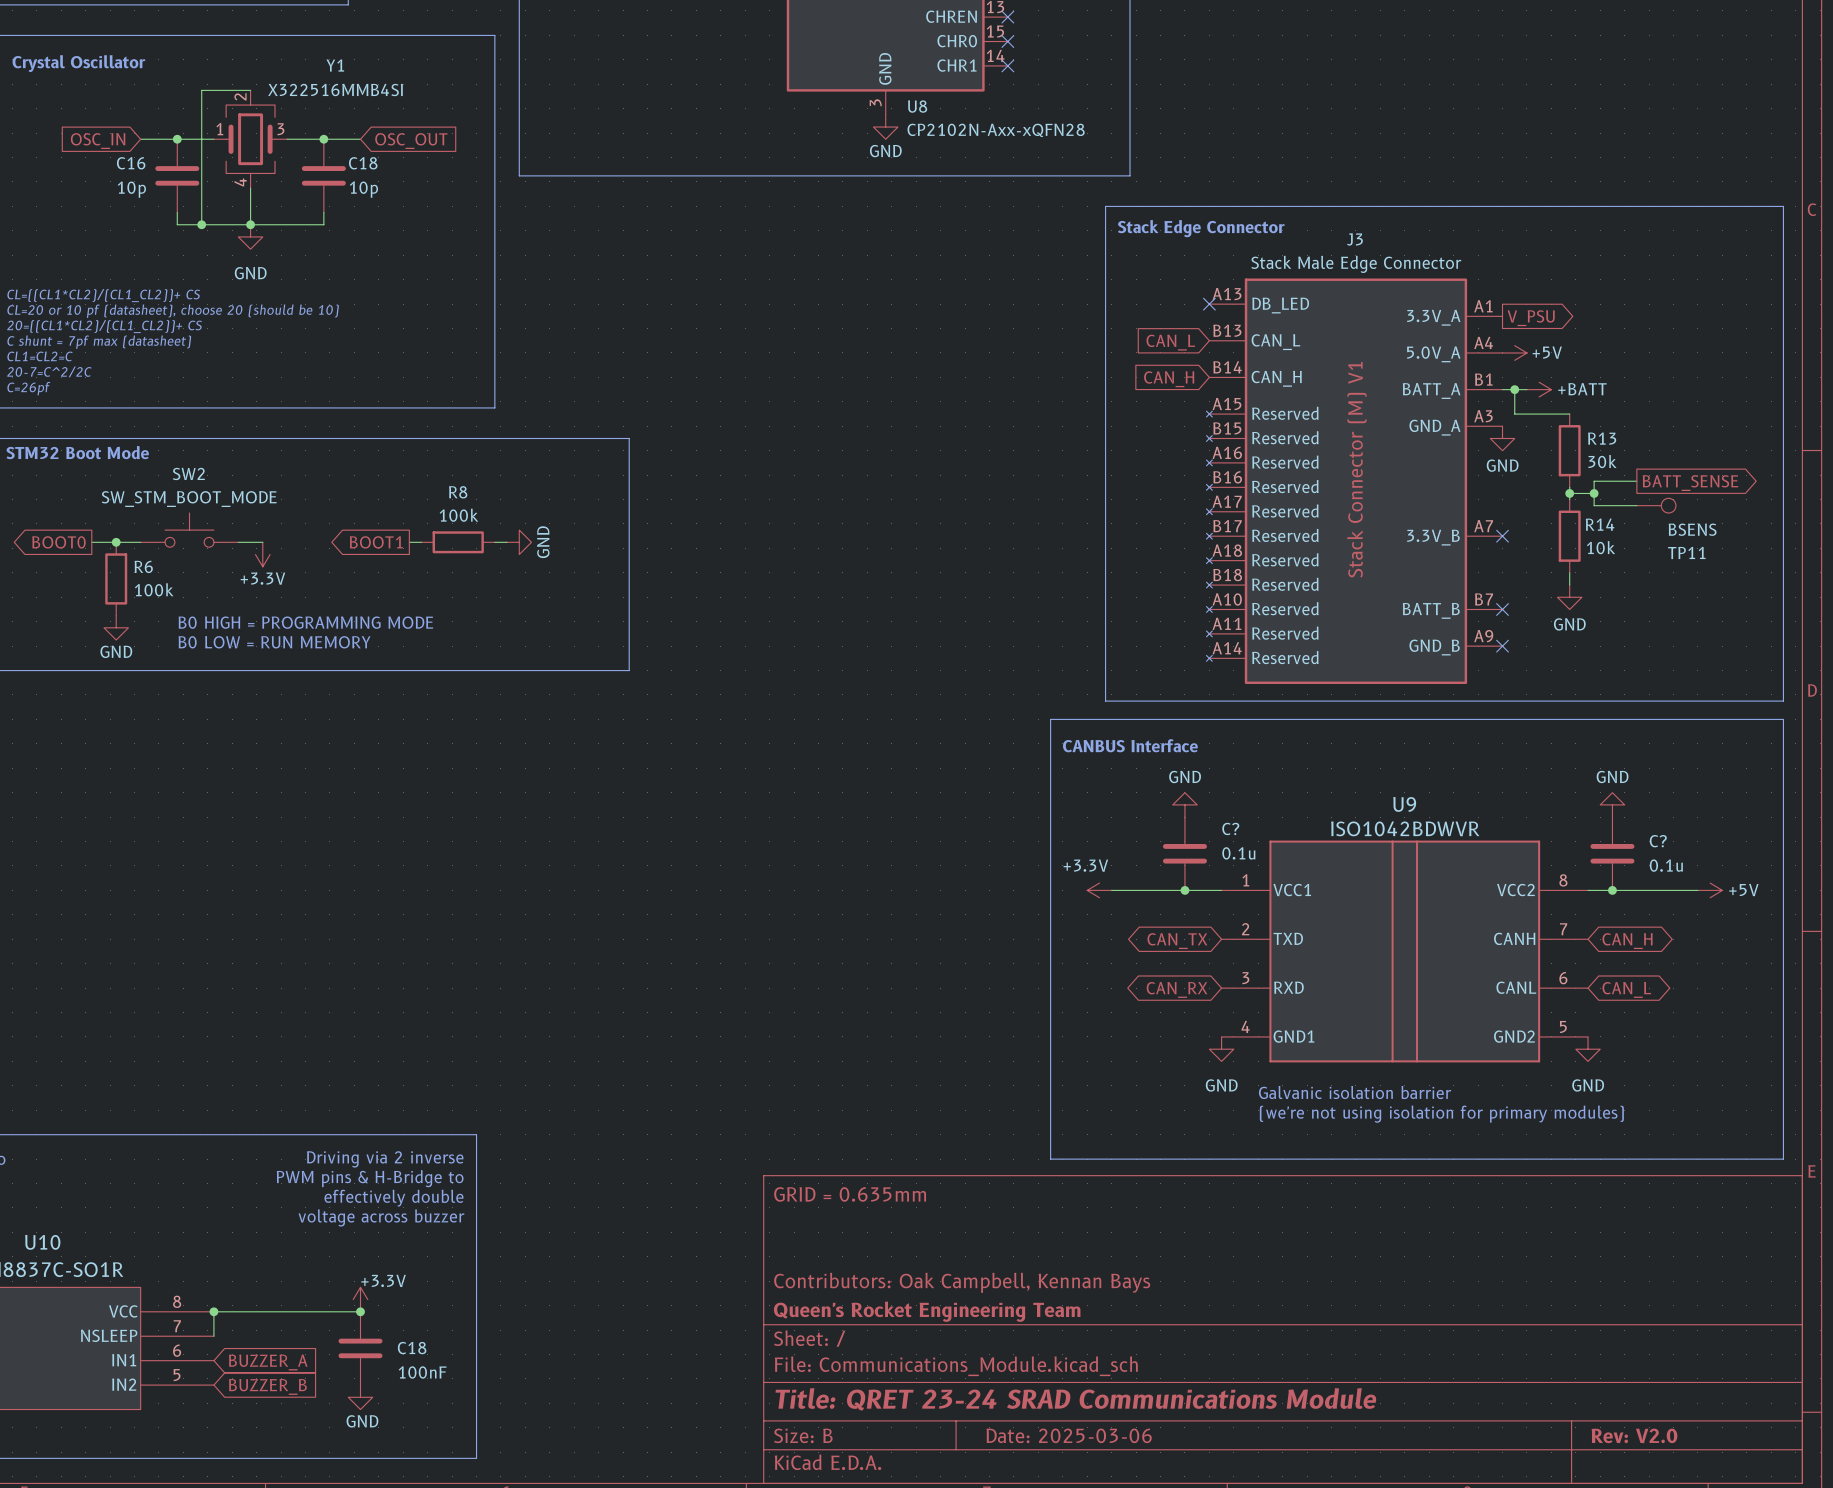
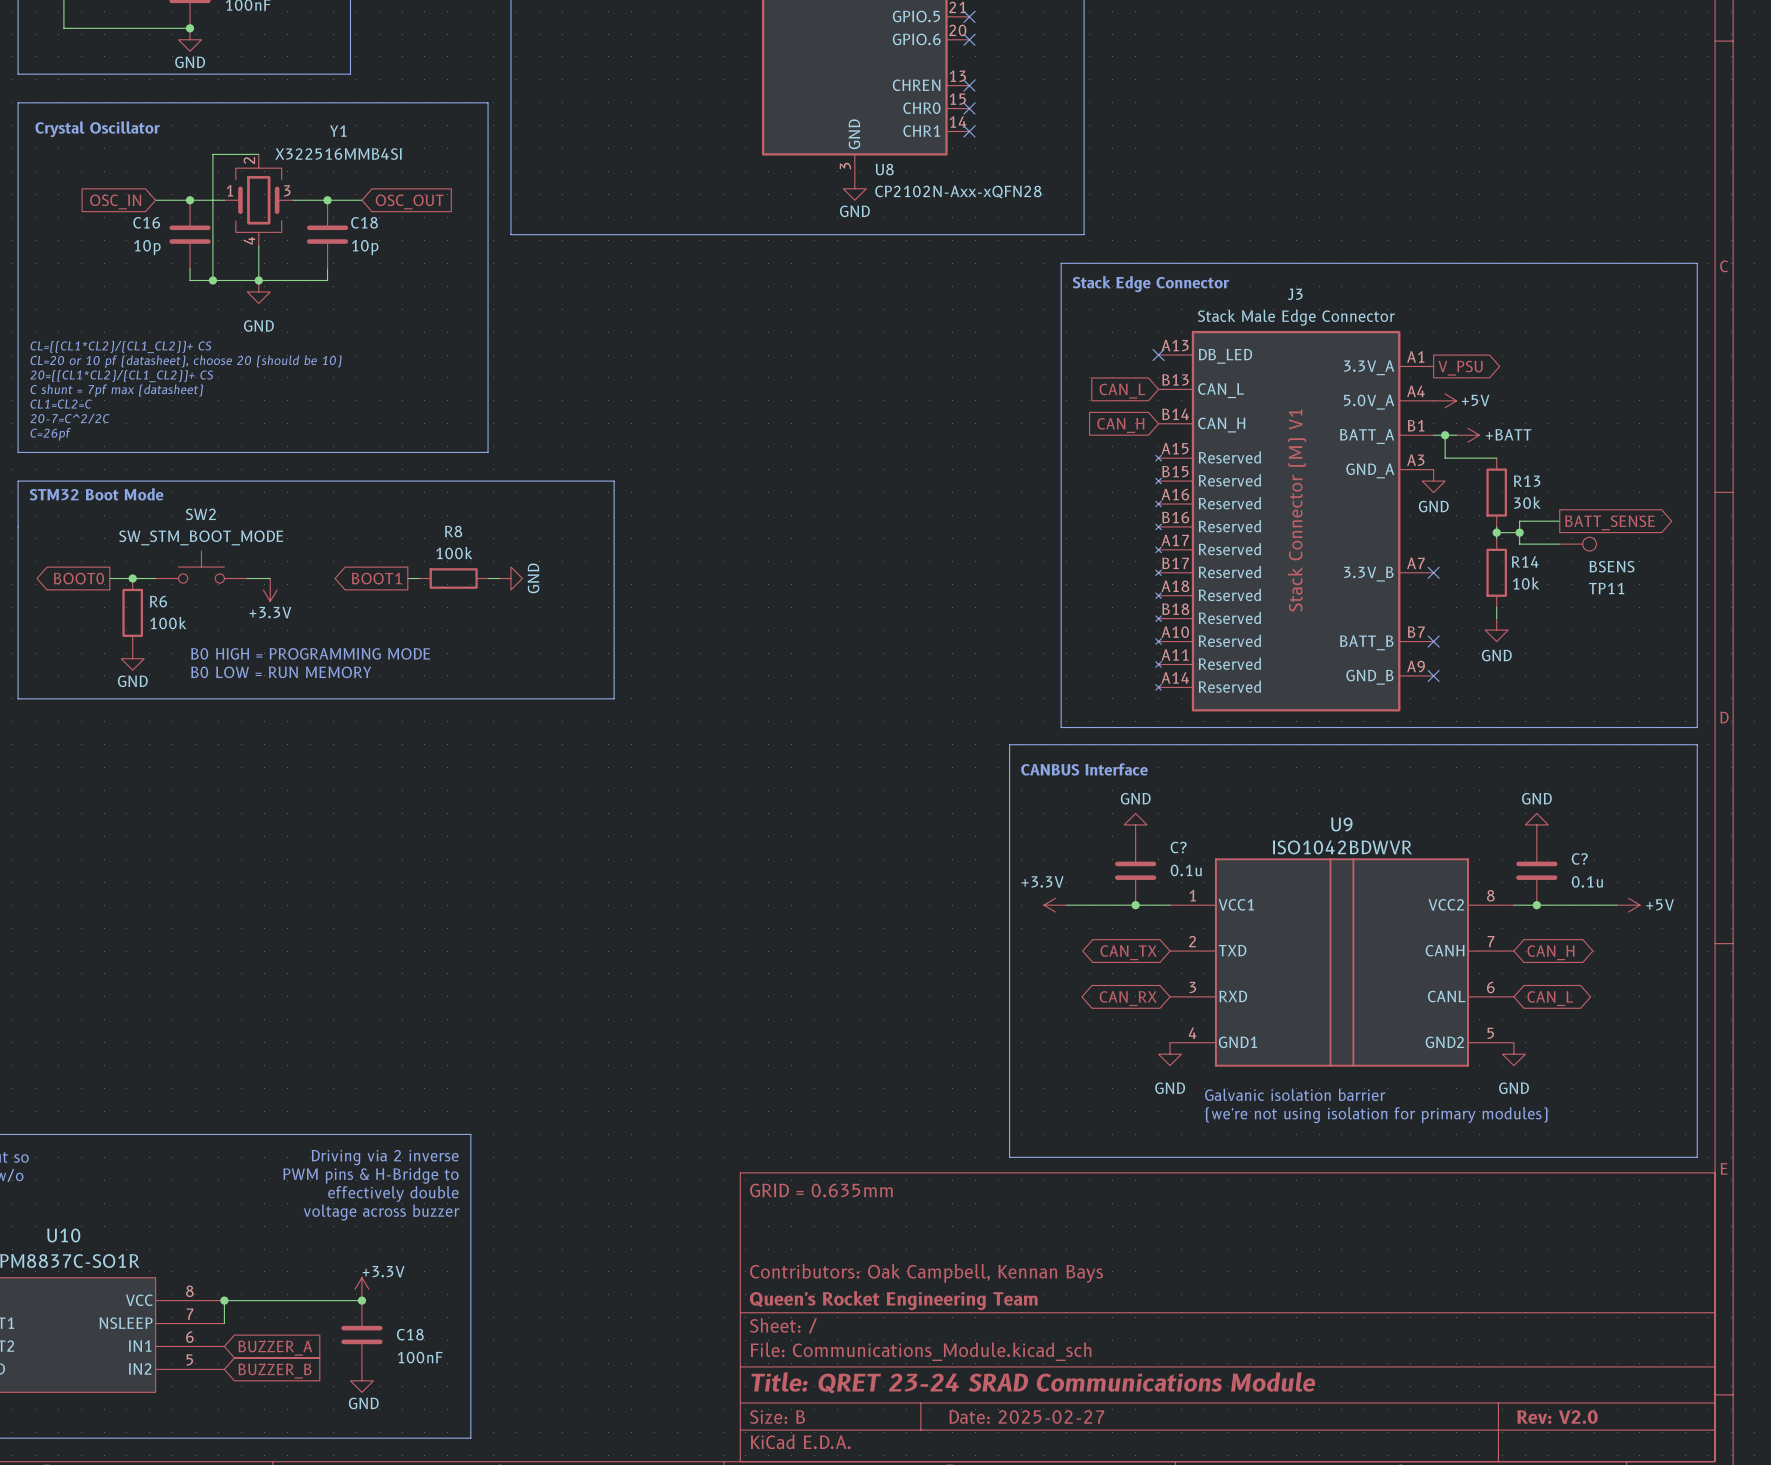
title block: Date: 2025-03-06 (1069, 1435) -> Date: 2025-02-27 (1026, 1417)

